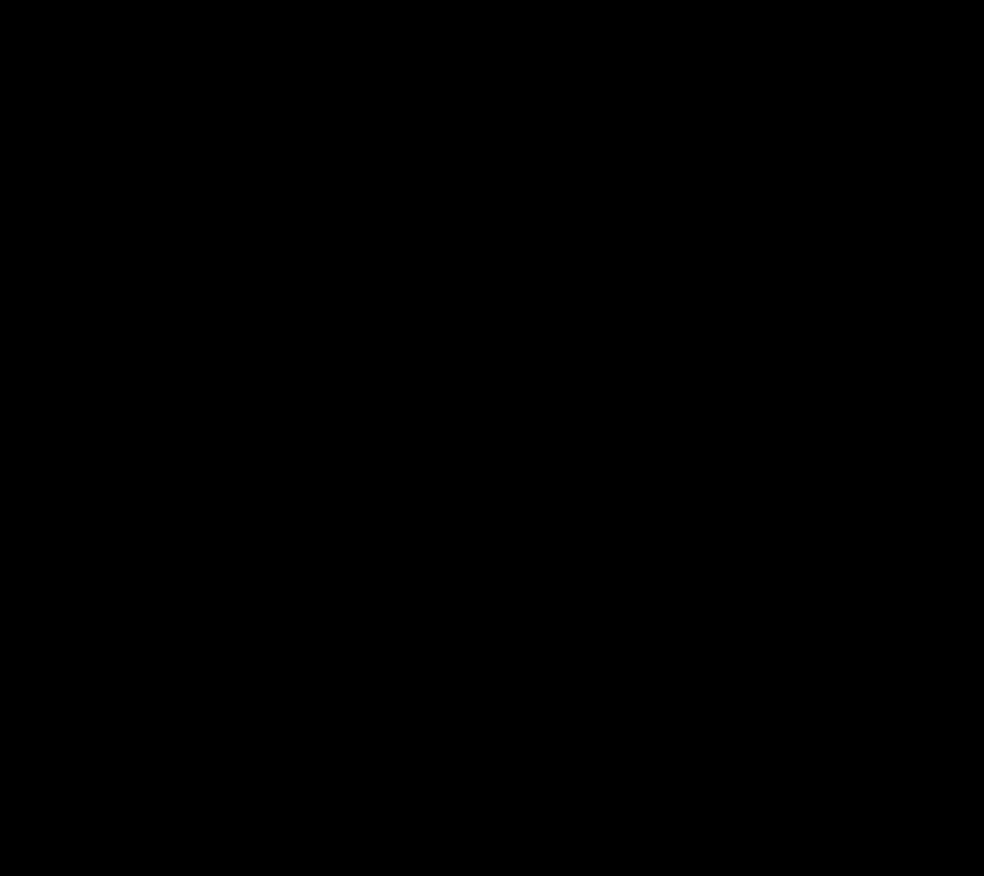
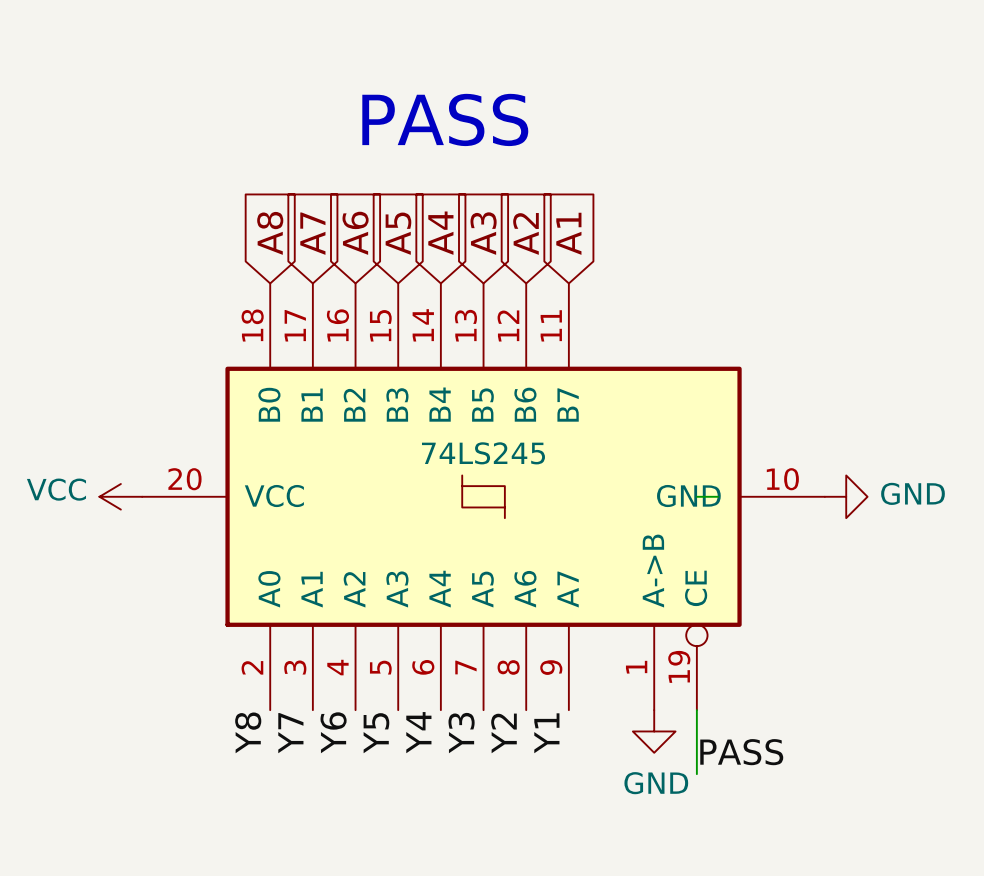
text: none -> PASS (445, 119)
global label: none -> A8 (270, 233)
global label: none -> A7 (312, 233)
global label: none -> A6 (355, 233)
global label: none -> A5 (398, 233)
global label: none -> A4 (440, 233)
global label: none -> A3 (483, 233)
global label: none -> A2 (525, 233)
global label: none -> A1 (568, 233)
power symbol: none -> VCC (120, 496)
part: none -> 74LS245 (483, 496)
wire: none -> (696, 496) (718, 496)
power symbol: none -> GND (846, 496)
wire: none -> (696, 710) (696, 774)
power symbol: none -> GND (654, 731)
label: none -> Y8 (248, 732)
label: none -> Y7 (290, 733)
label: none -> Y6 (333, 732)
label: none -> Y5 (376, 733)
label: none -> Y4 (418, 732)
label: none -> Y3 (461, 733)
label: none -> Y2 (503, 733)
label: none -> Y1 (546, 733)
label: none -> PASS (741, 752)

